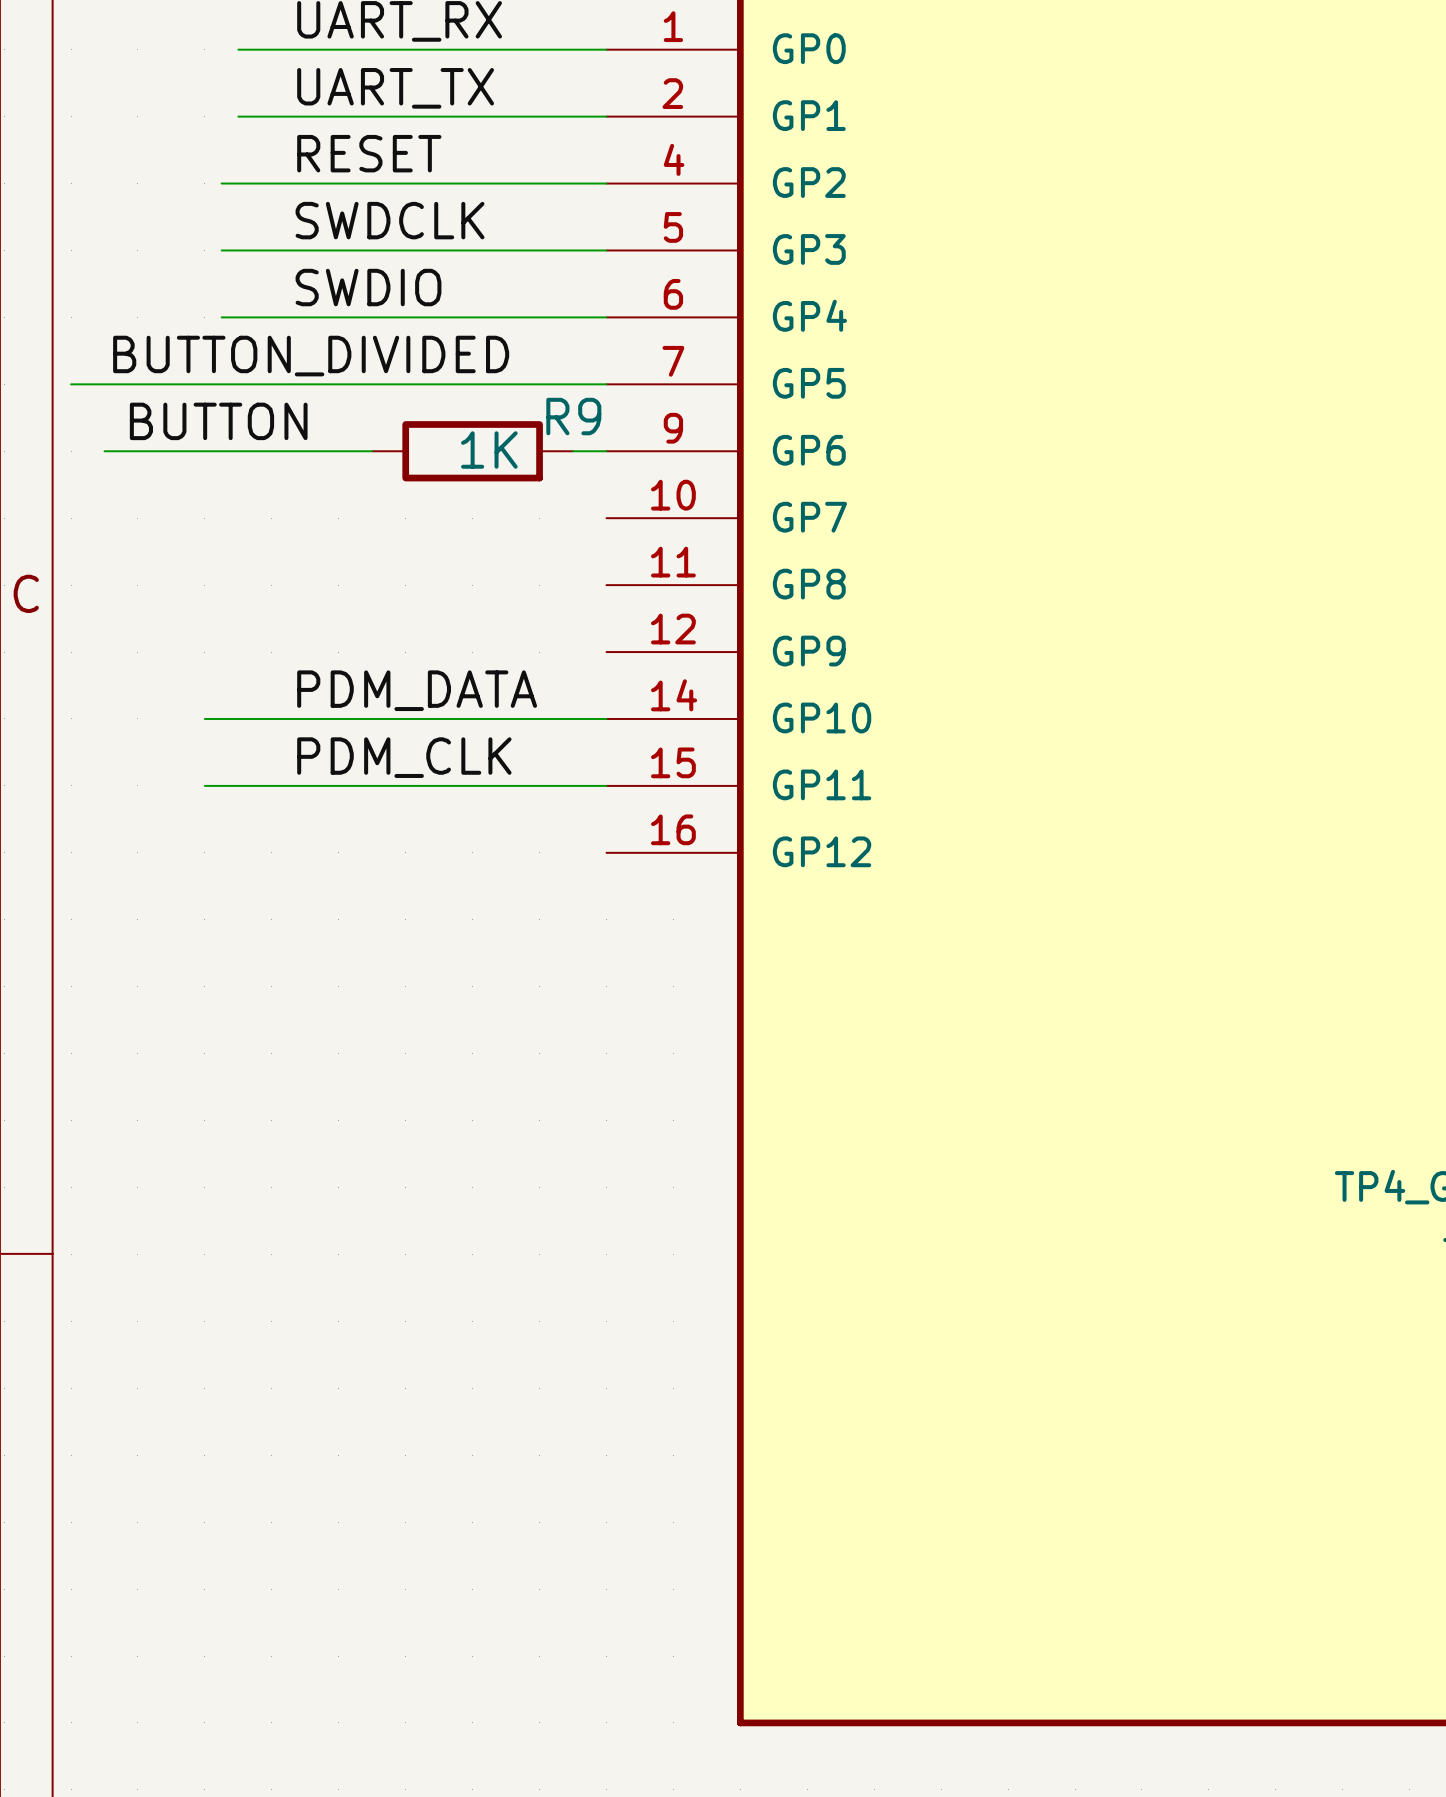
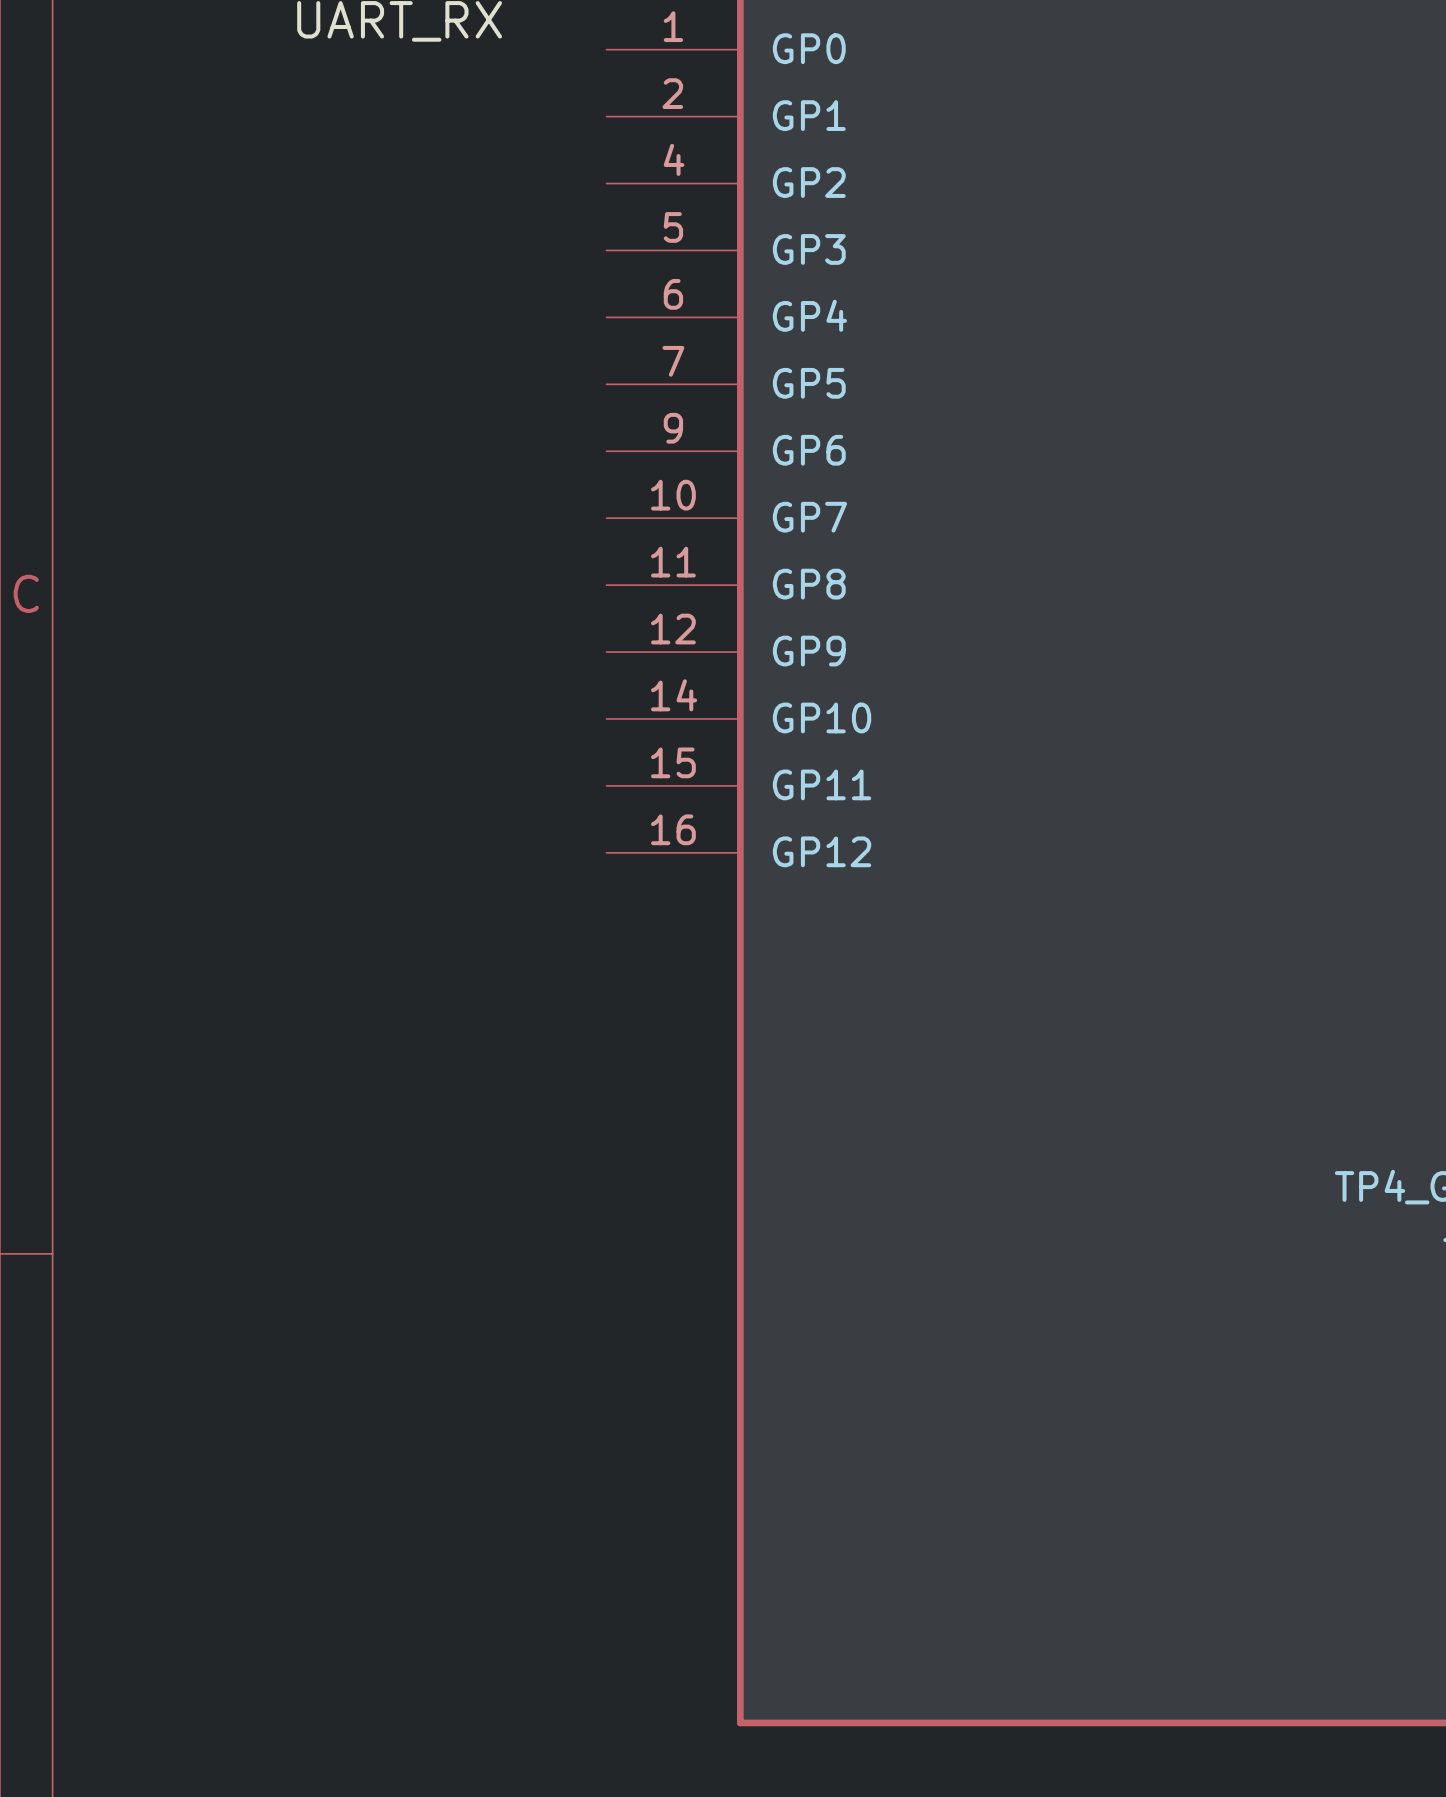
wire: (238, 49) (606, 49) -> none
label: UART_TX (395, 88) -> none
wire: (238, 116) (606, 116) -> none
label: RESET (369, 153) -> none
wire: (221, 183) (606, 183) -> none
label: SWDCLK (390, 220) -> none
wire: (221, 250) (606, 250) -> none
label: SWDIO (368, 287) -> none
wire: (221, 317) (606, 317) -> none
label: BUTTON_DIVIDED (311, 356) -> none
wire: (71, 384) (606, 384) -> none
label: BUTTON (218, 421) -> none
wire: (104, 451) (372, 451) -> none
R9: 1K (472, 451) -> none
wire: (573, 451) (606, 451) -> none
label: PDM_DATA (417, 690) -> none
wire: (204, 718) (606, 718) -> none
label: PDM_CLK (404, 757) -> none
wire: (204, 785) (606, 785) -> none

